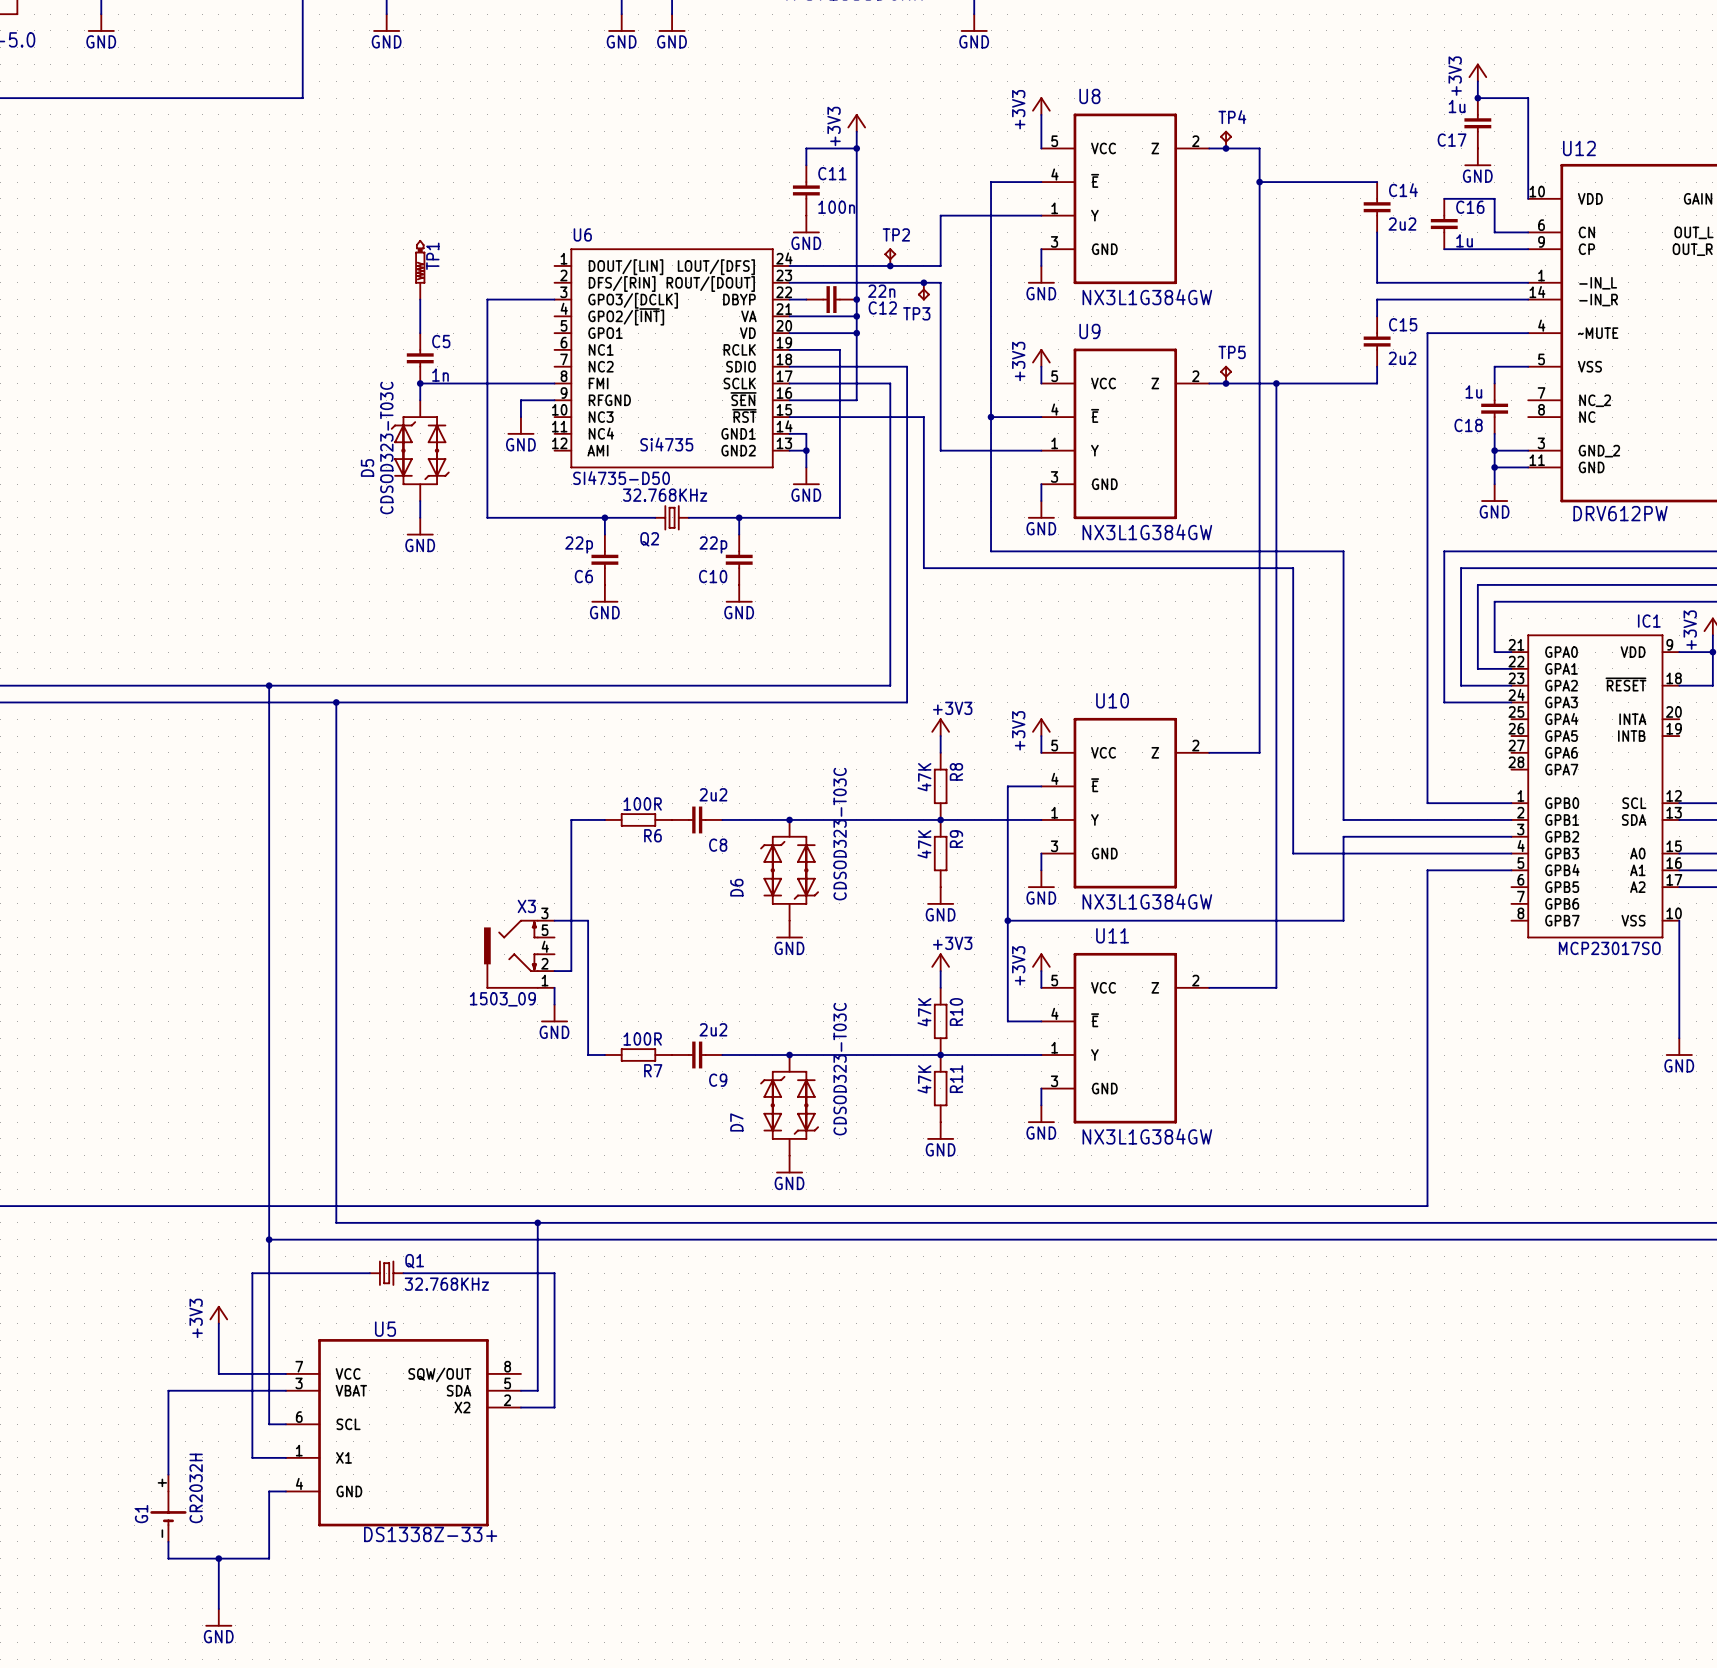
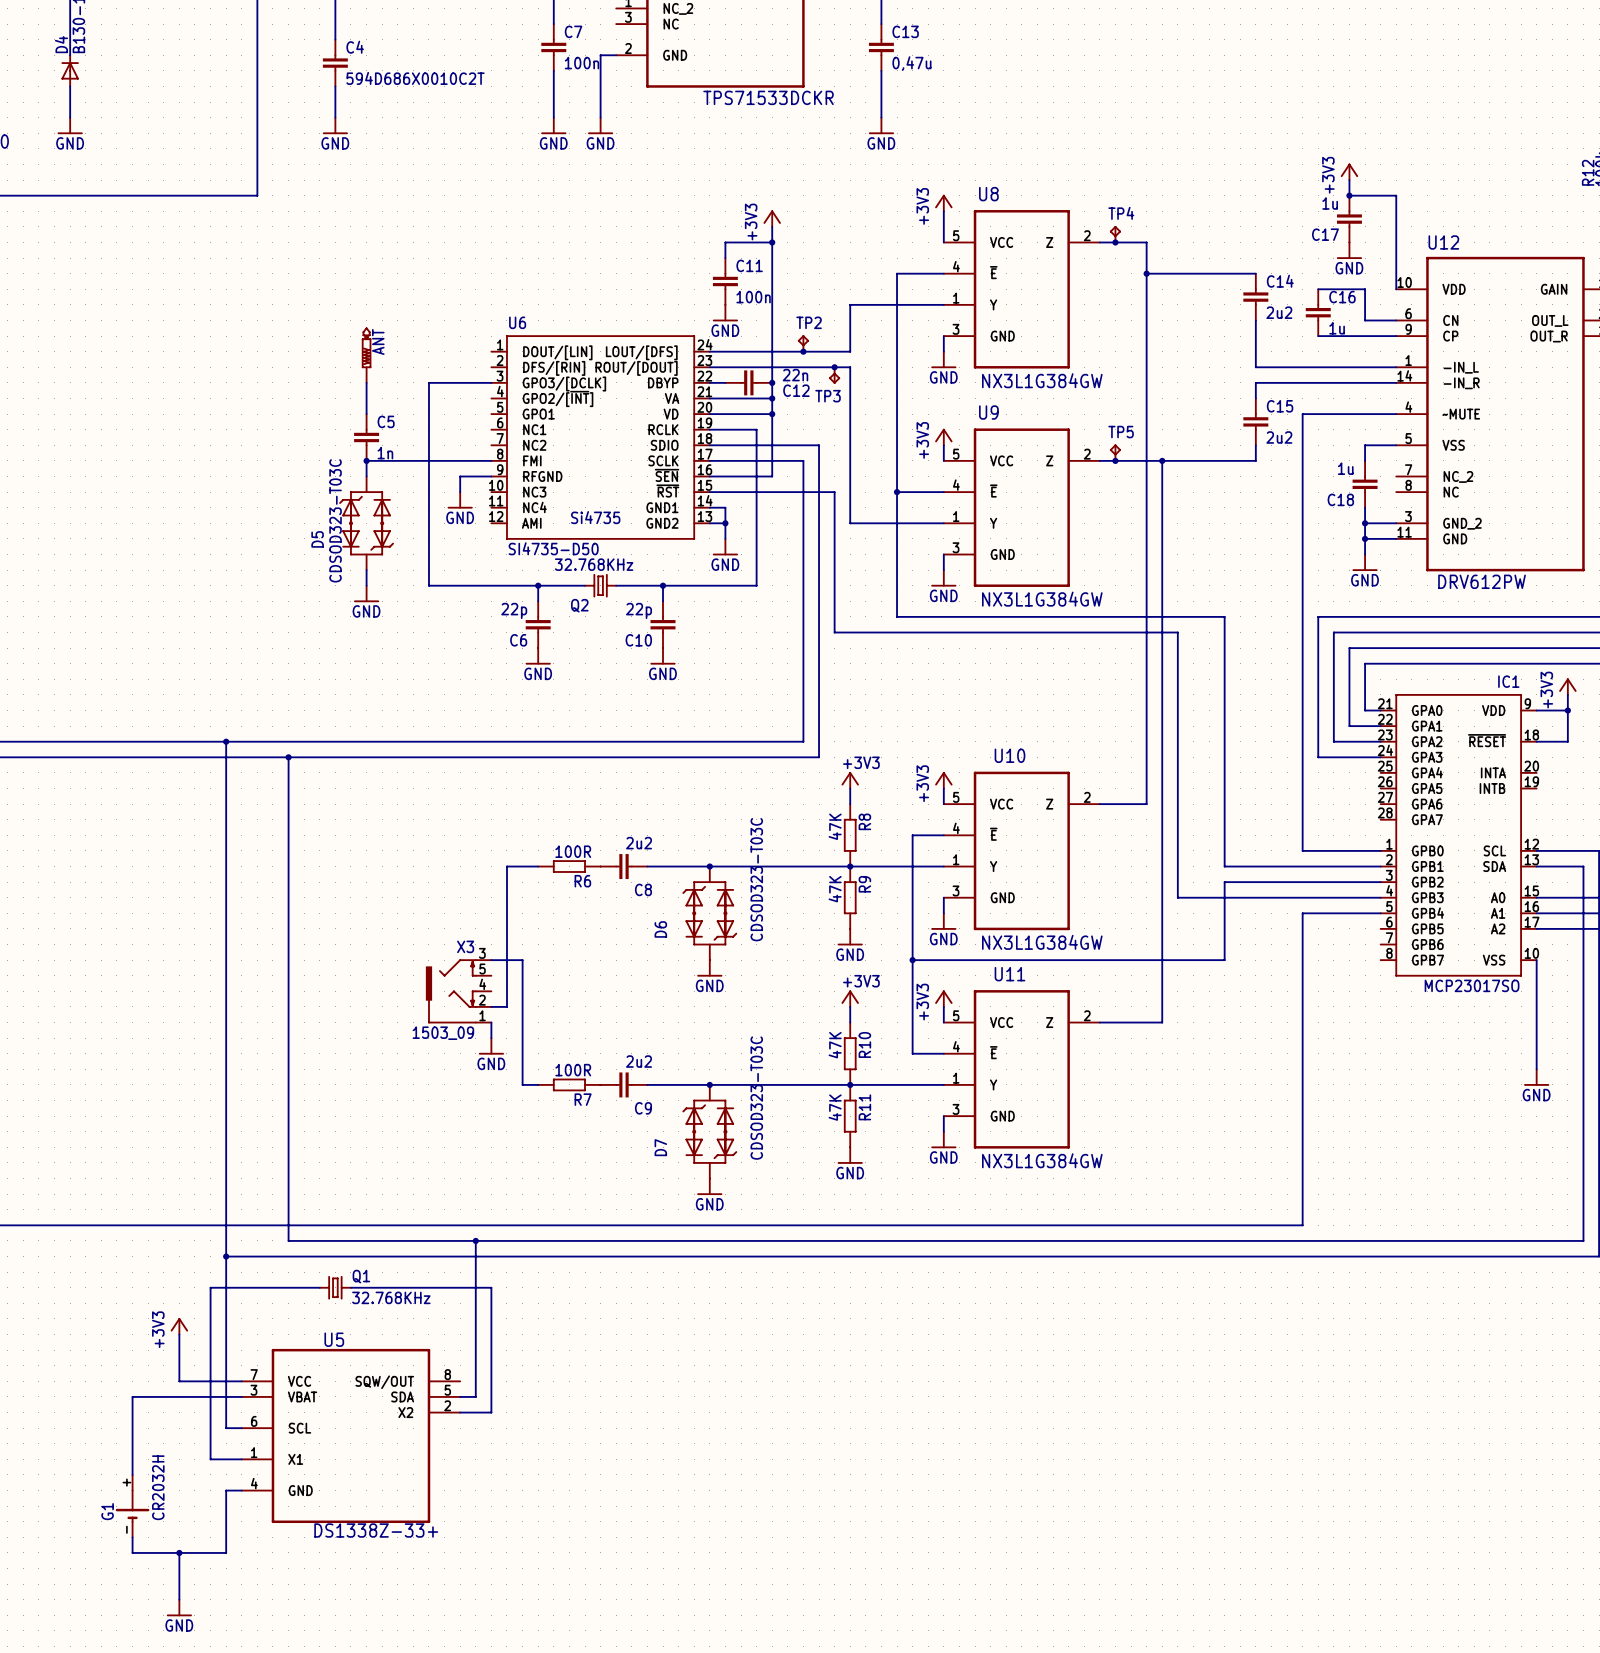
TP1 name: TP1 (432, 256) -> ANT (378, 341)

